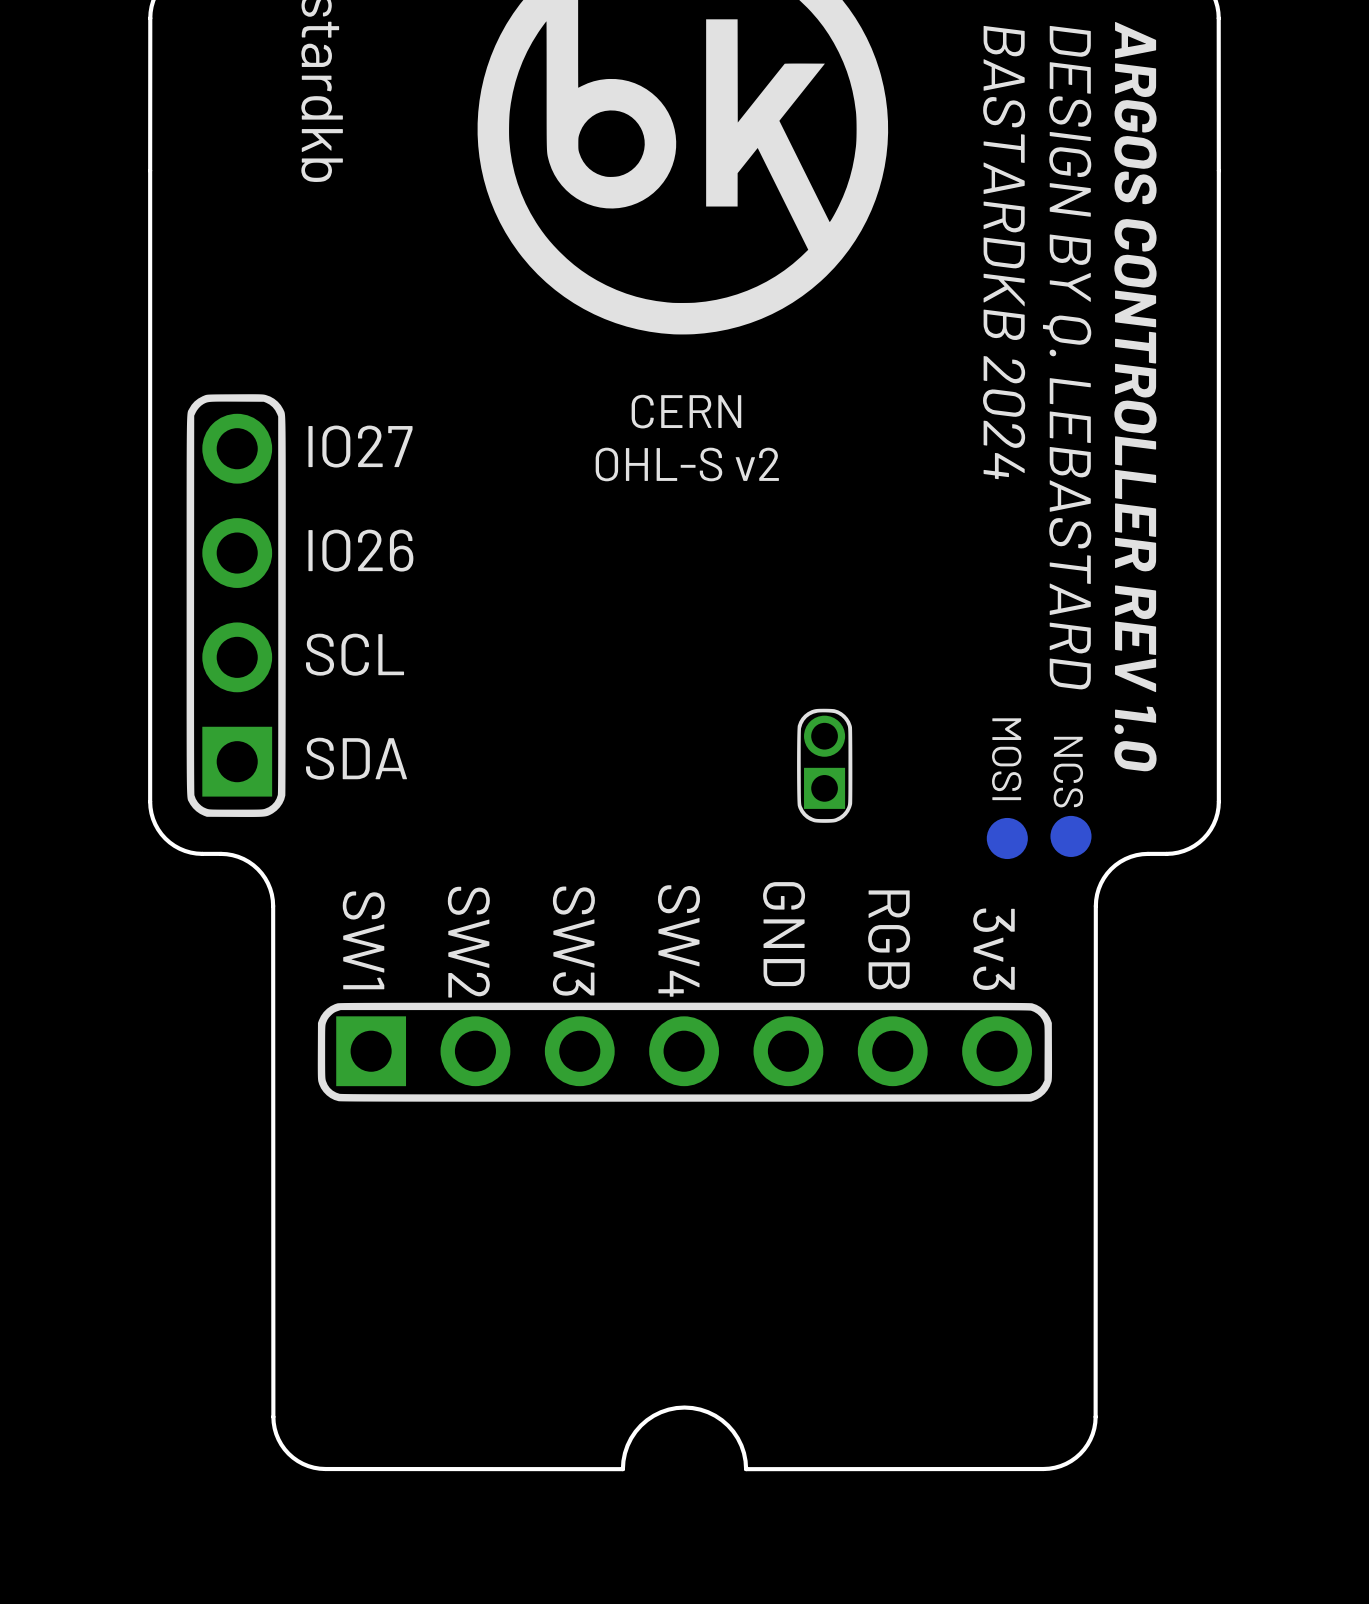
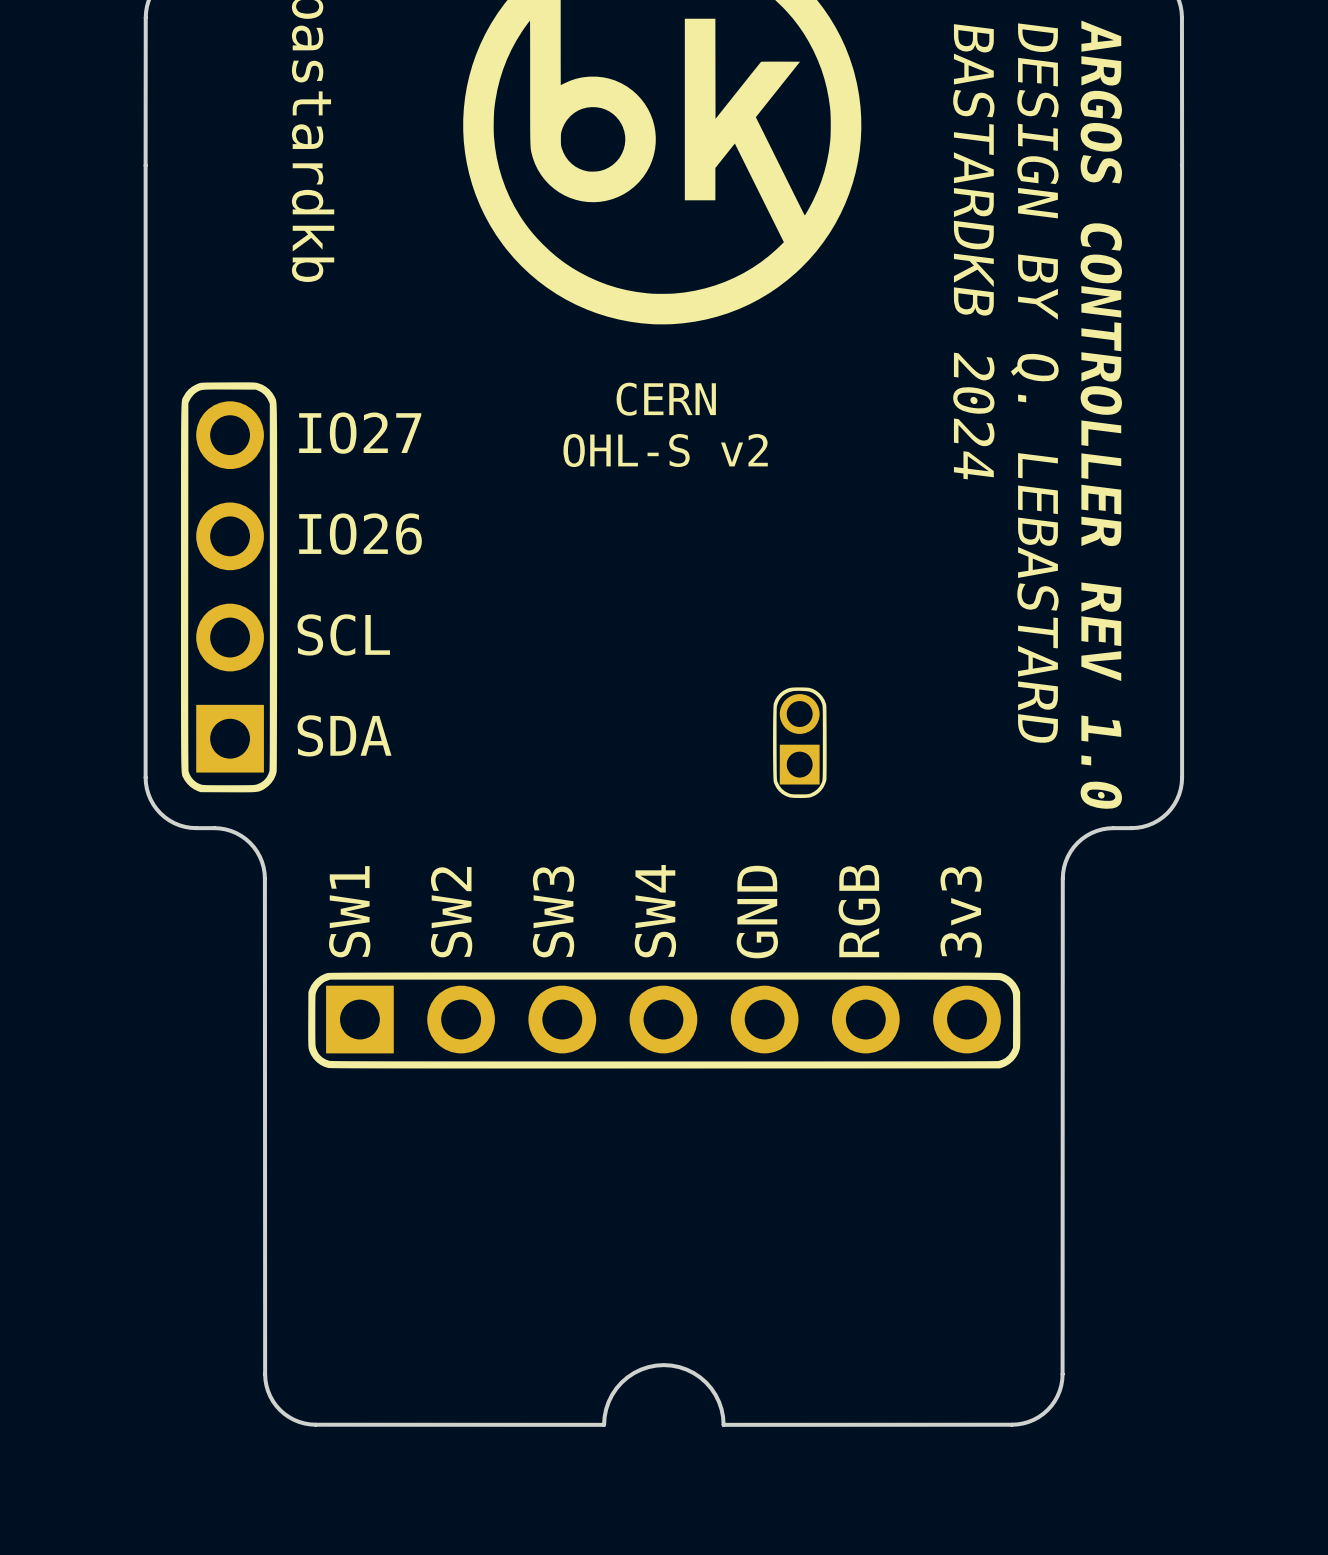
text: MOSI (1006, 759) -> none
text: NCS (1068, 772) -> none
part: (1070, 836) -> none
part: (1007, 838) -> none
text rotation: 0° (784, 934) -> 180° (757, 912)
text rotation: 0° (889, 939) -> 180° (859, 911)
text rotation: 0° (363, 940) -> 180° (349, 911)
text rotation: 0° (678, 940) -> 180° (655, 911)
text rotation: 0° (573, 941) -> 180° (553, 911)
text rotation: 0° (468, 942) -> 180° (451, 912)
text rotation: 0° (993, 949) -> 180° (961, 911)

